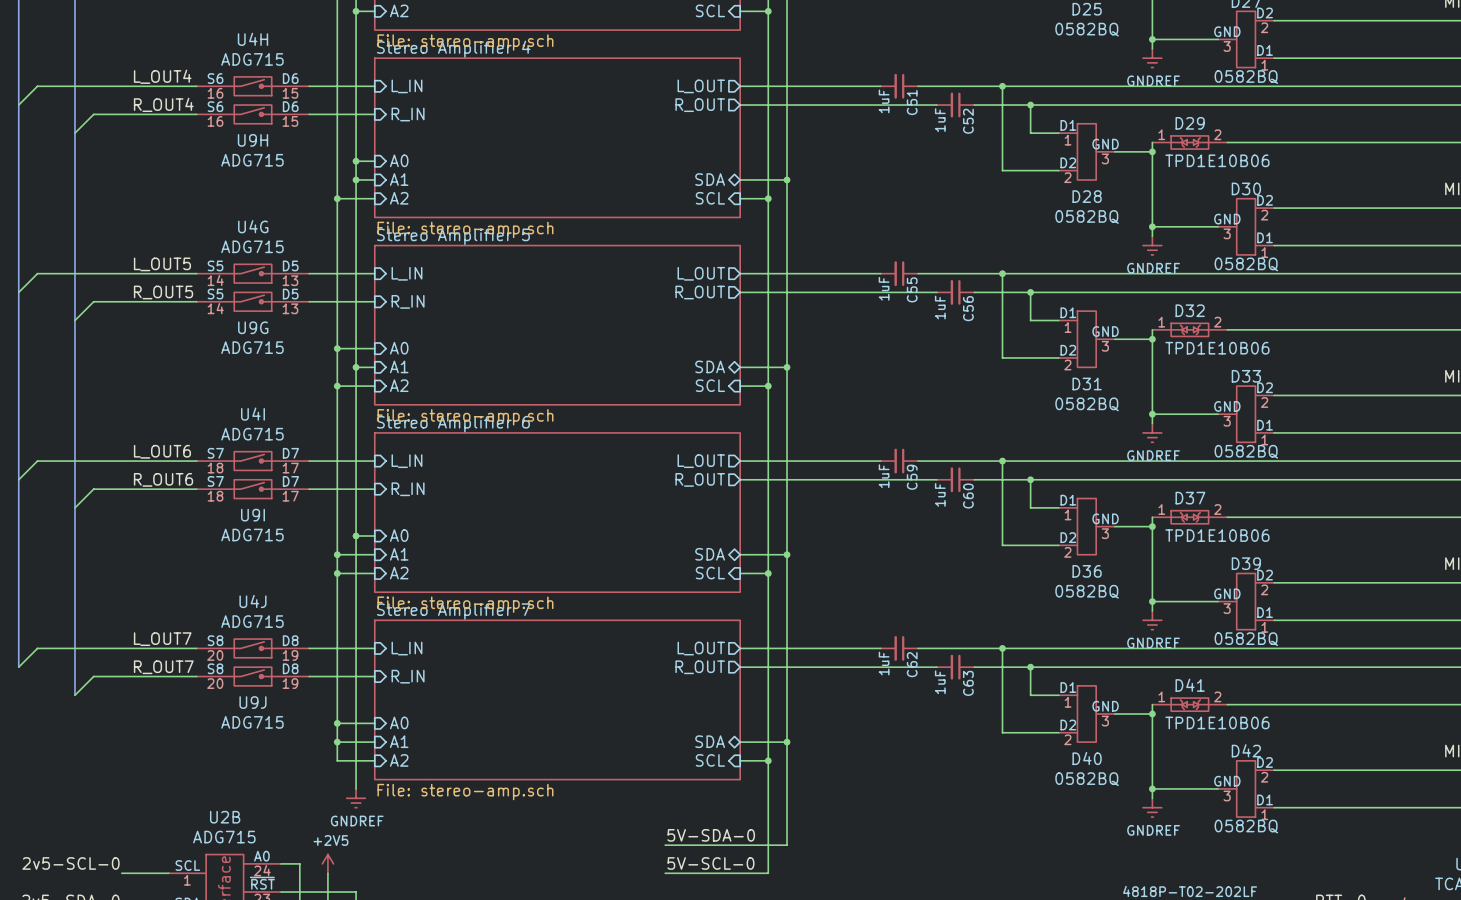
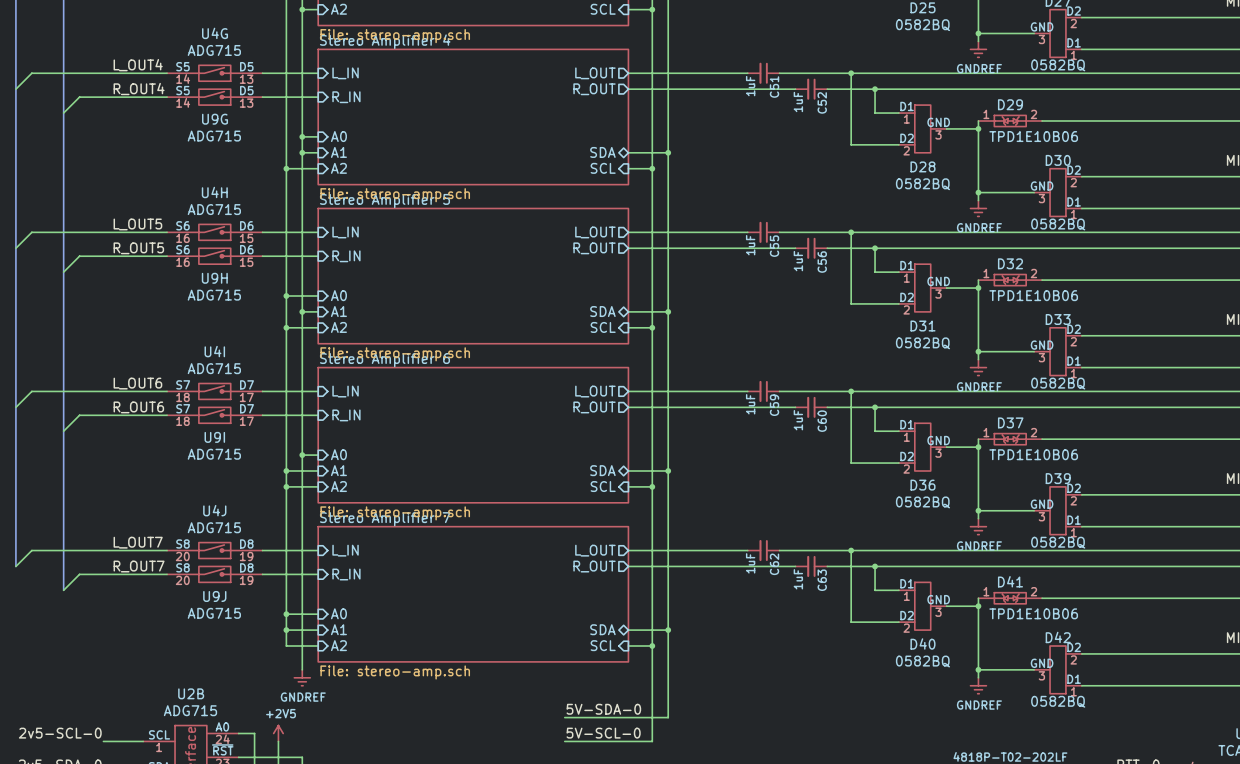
U4H position: (252, 86) -> (214, 232)
U9H position: (252, 114) -> (214, 256)
U4G position: (252, 273) -> (214, 73)
U9G position: (252, 301) -> (214, 97)

